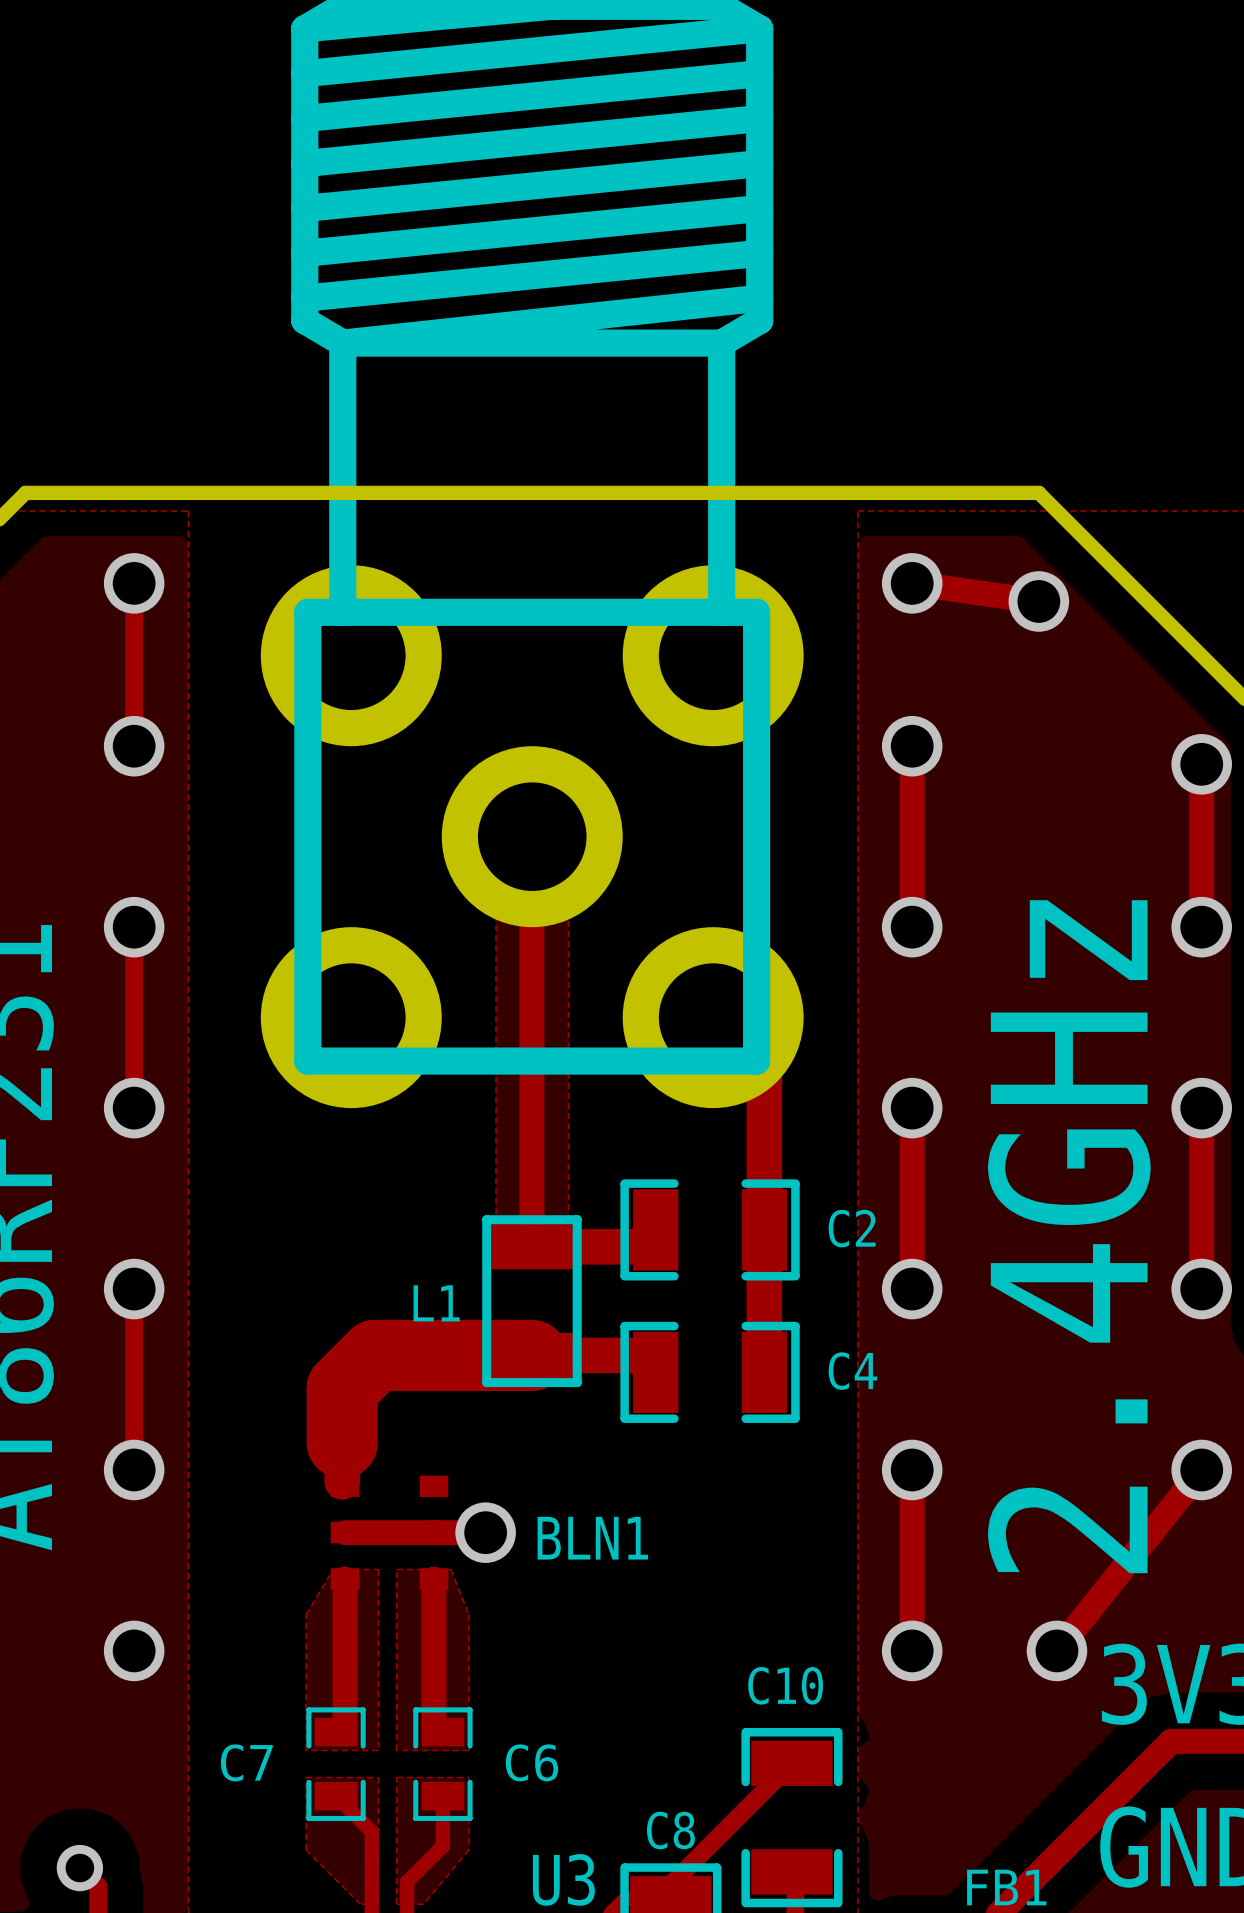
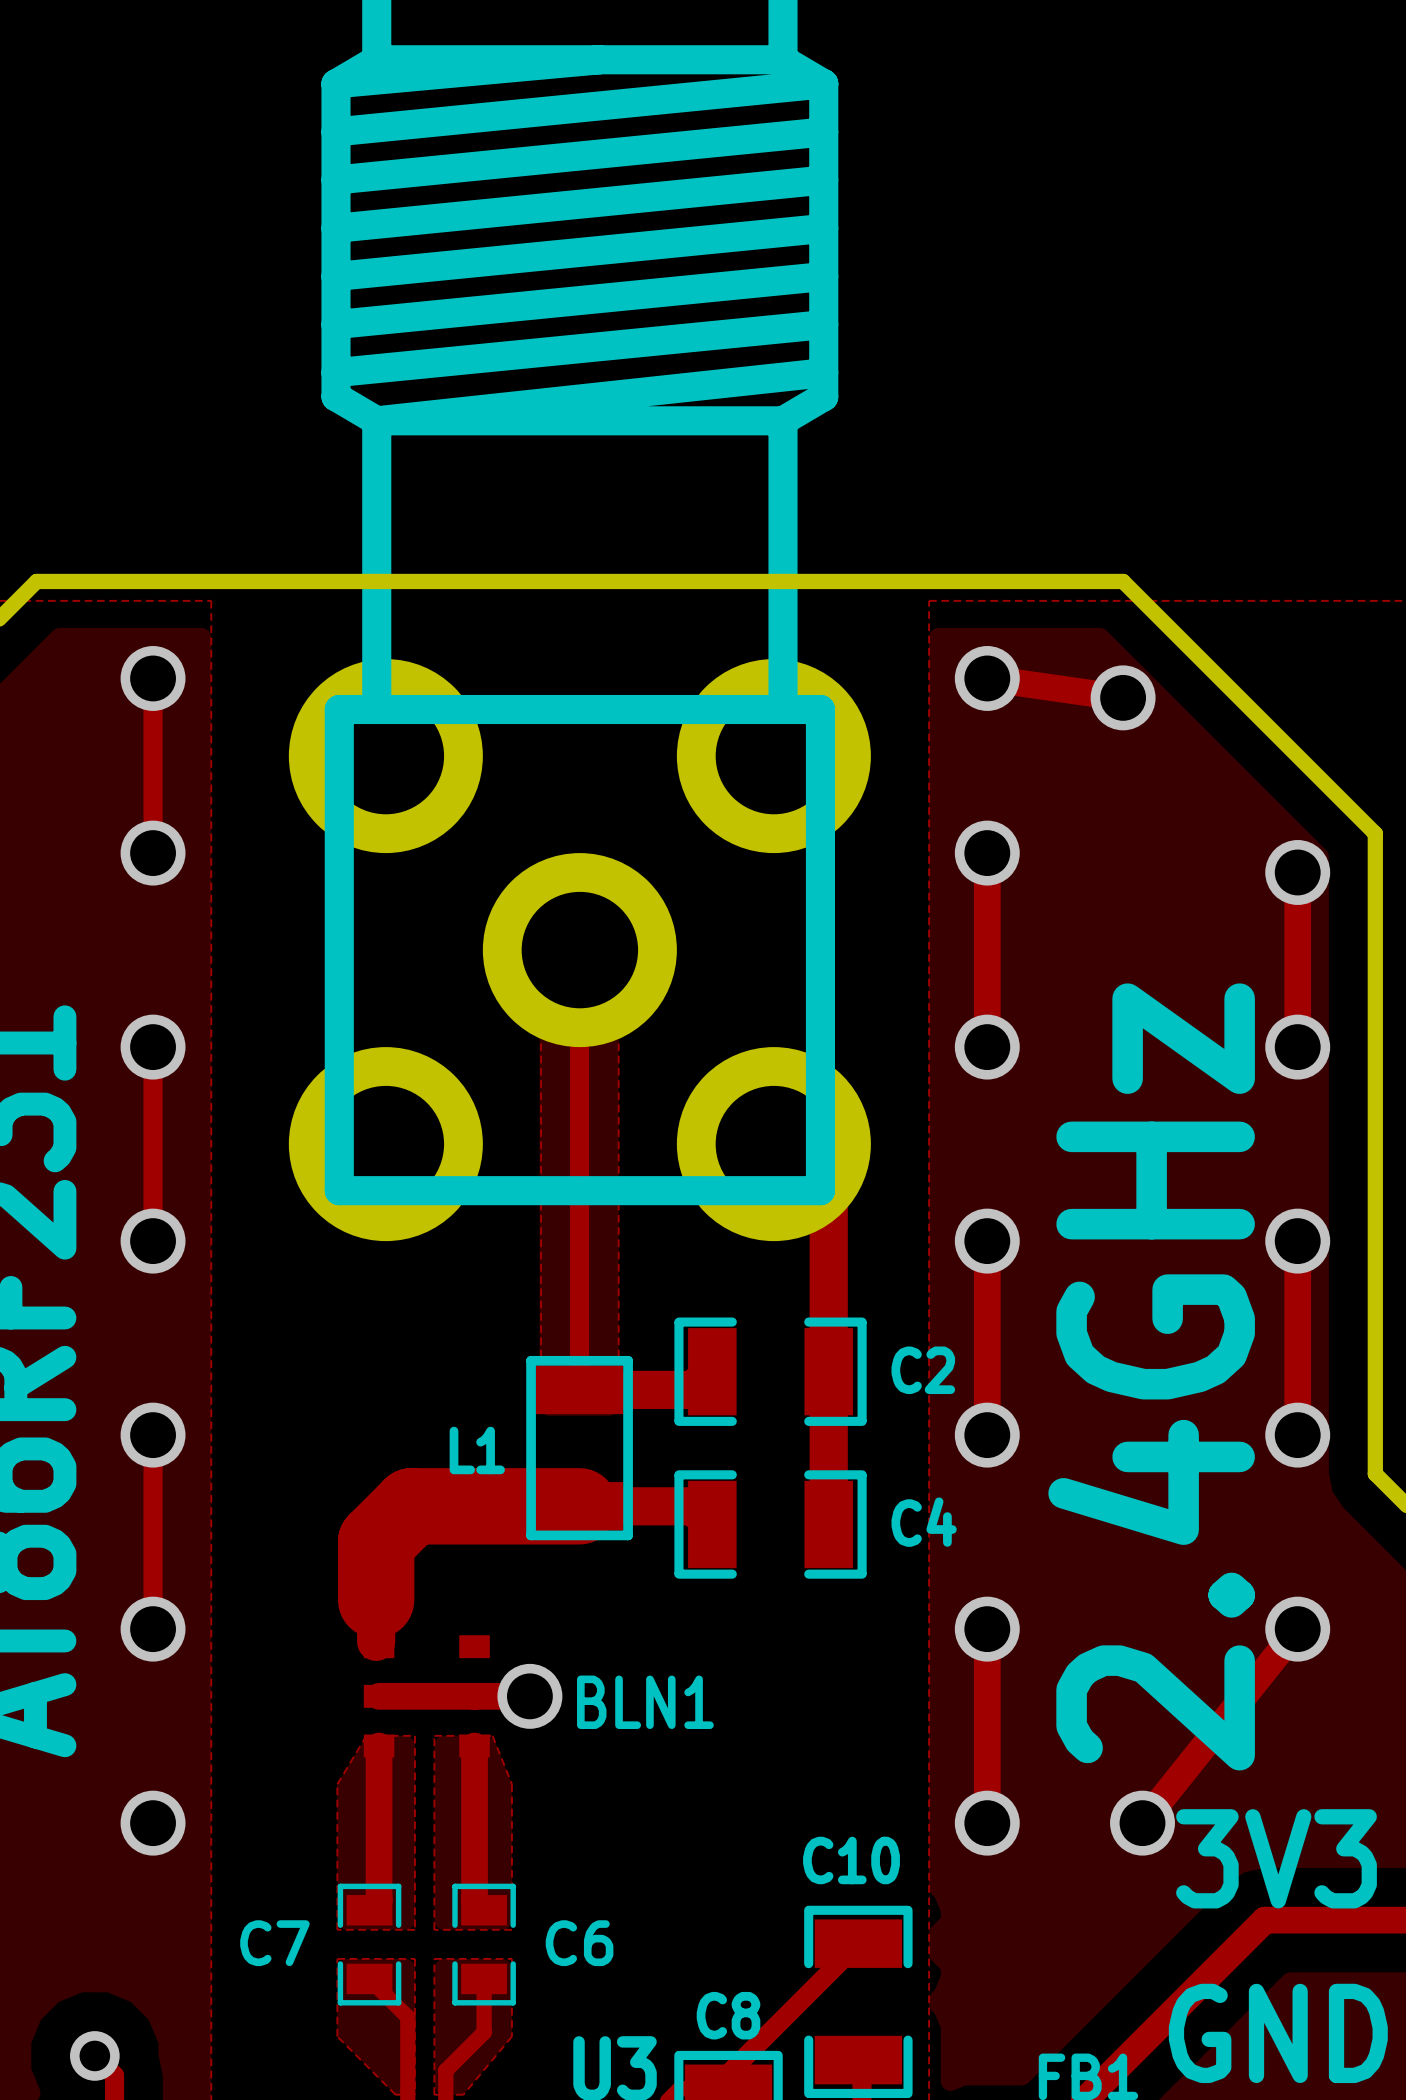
track width: thick (531, 836) (531, 1246) -> thin (579, 950) (579, 1389)

